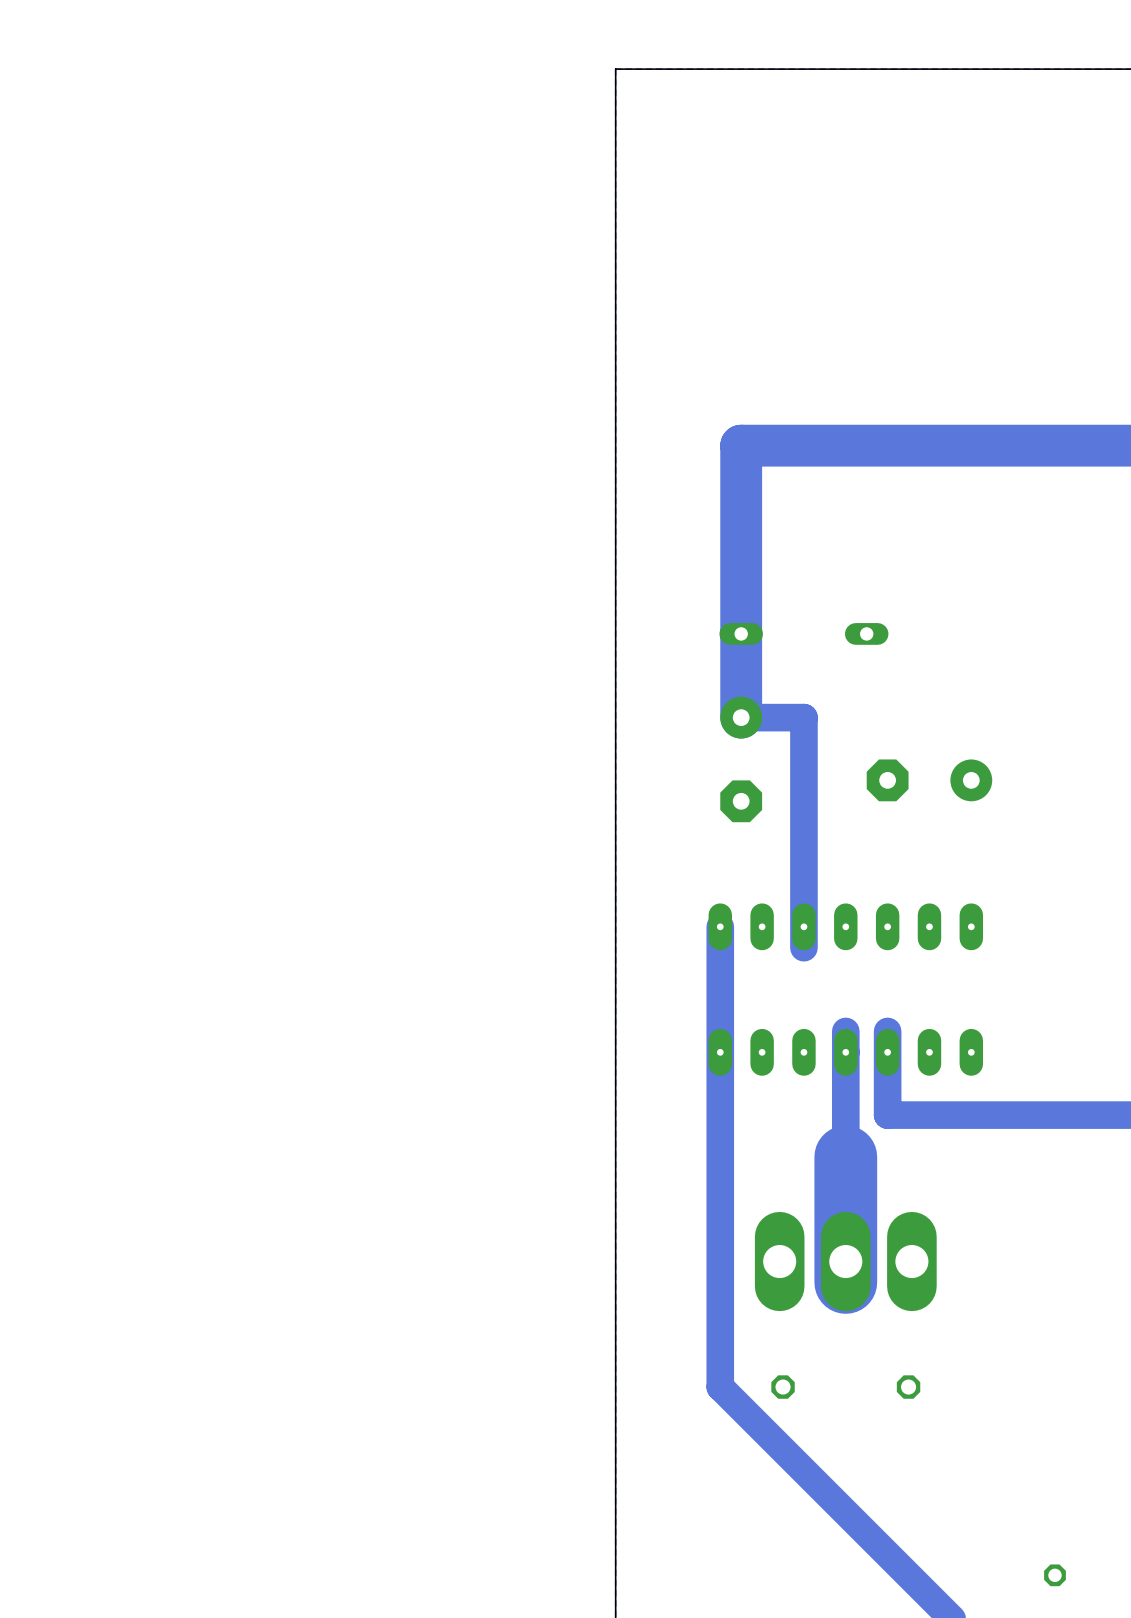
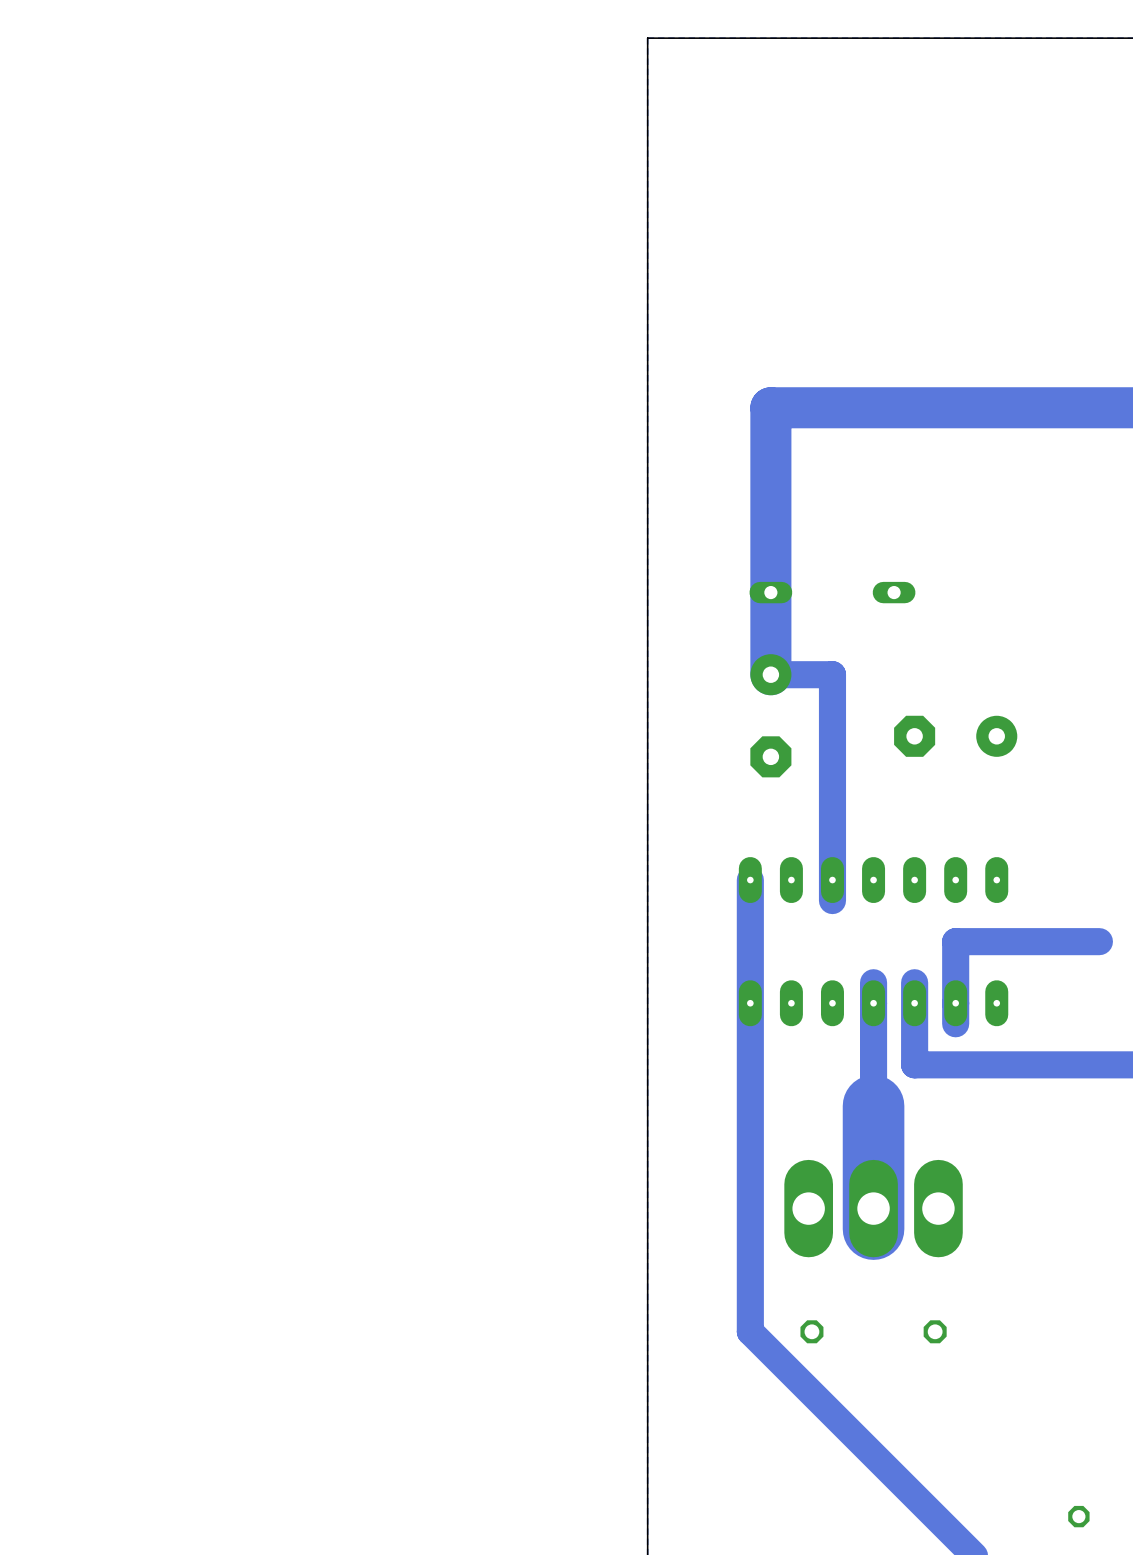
track: none -> (1099, 941) (955, 941) (955, 1023)

